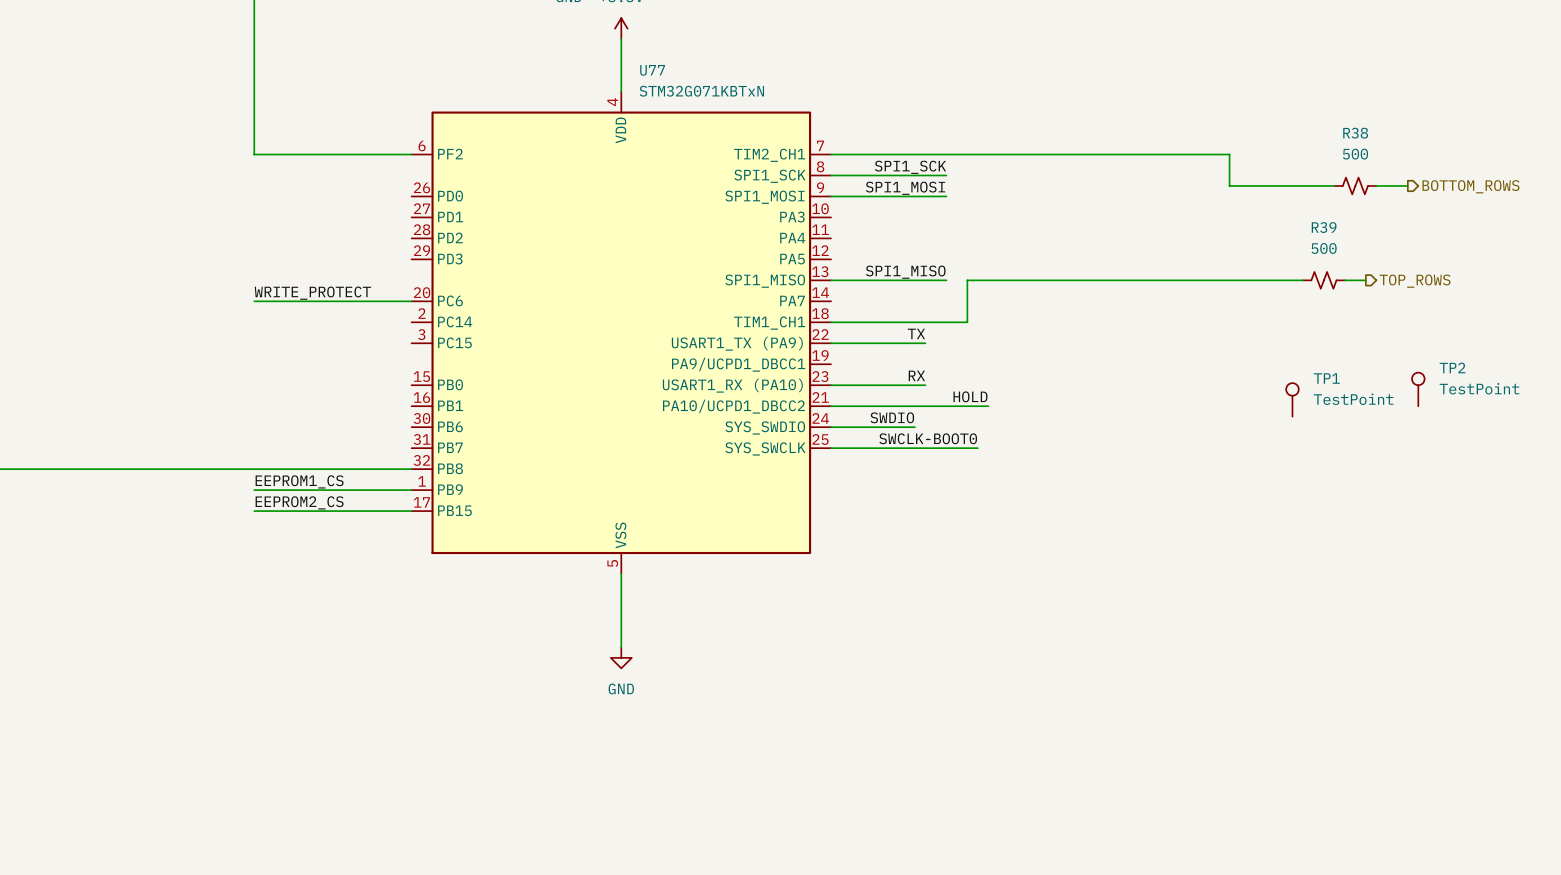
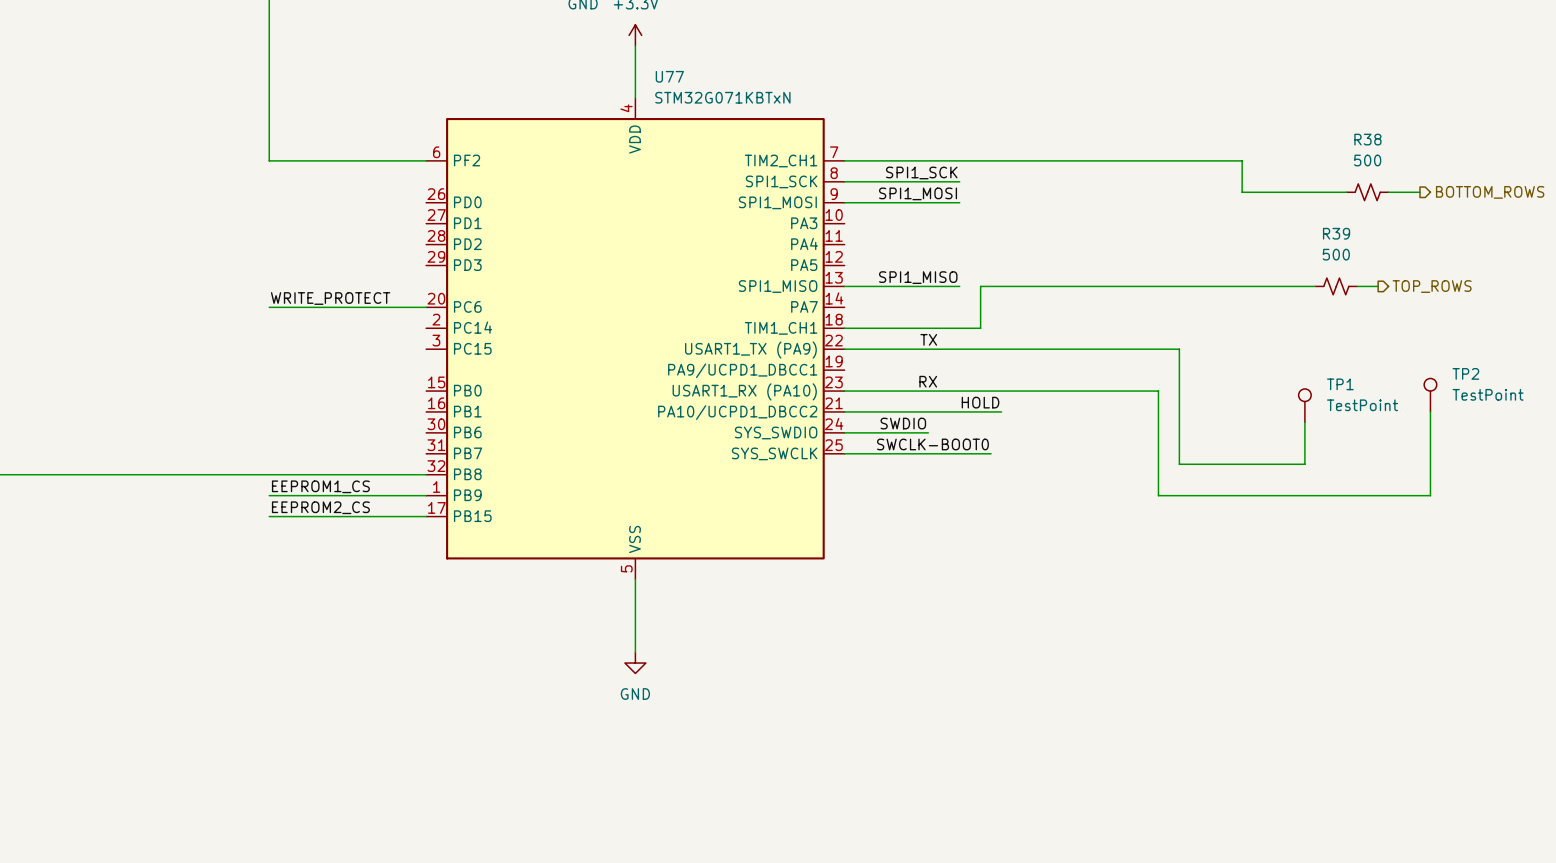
wire: none -> (938, 349) (1179, 349) (1179, 464) (1304, 464) (1304, 422)
wire: none -> (938, 391) (1158, 391) (1158, 495) (1430, 495) (1430, 411)

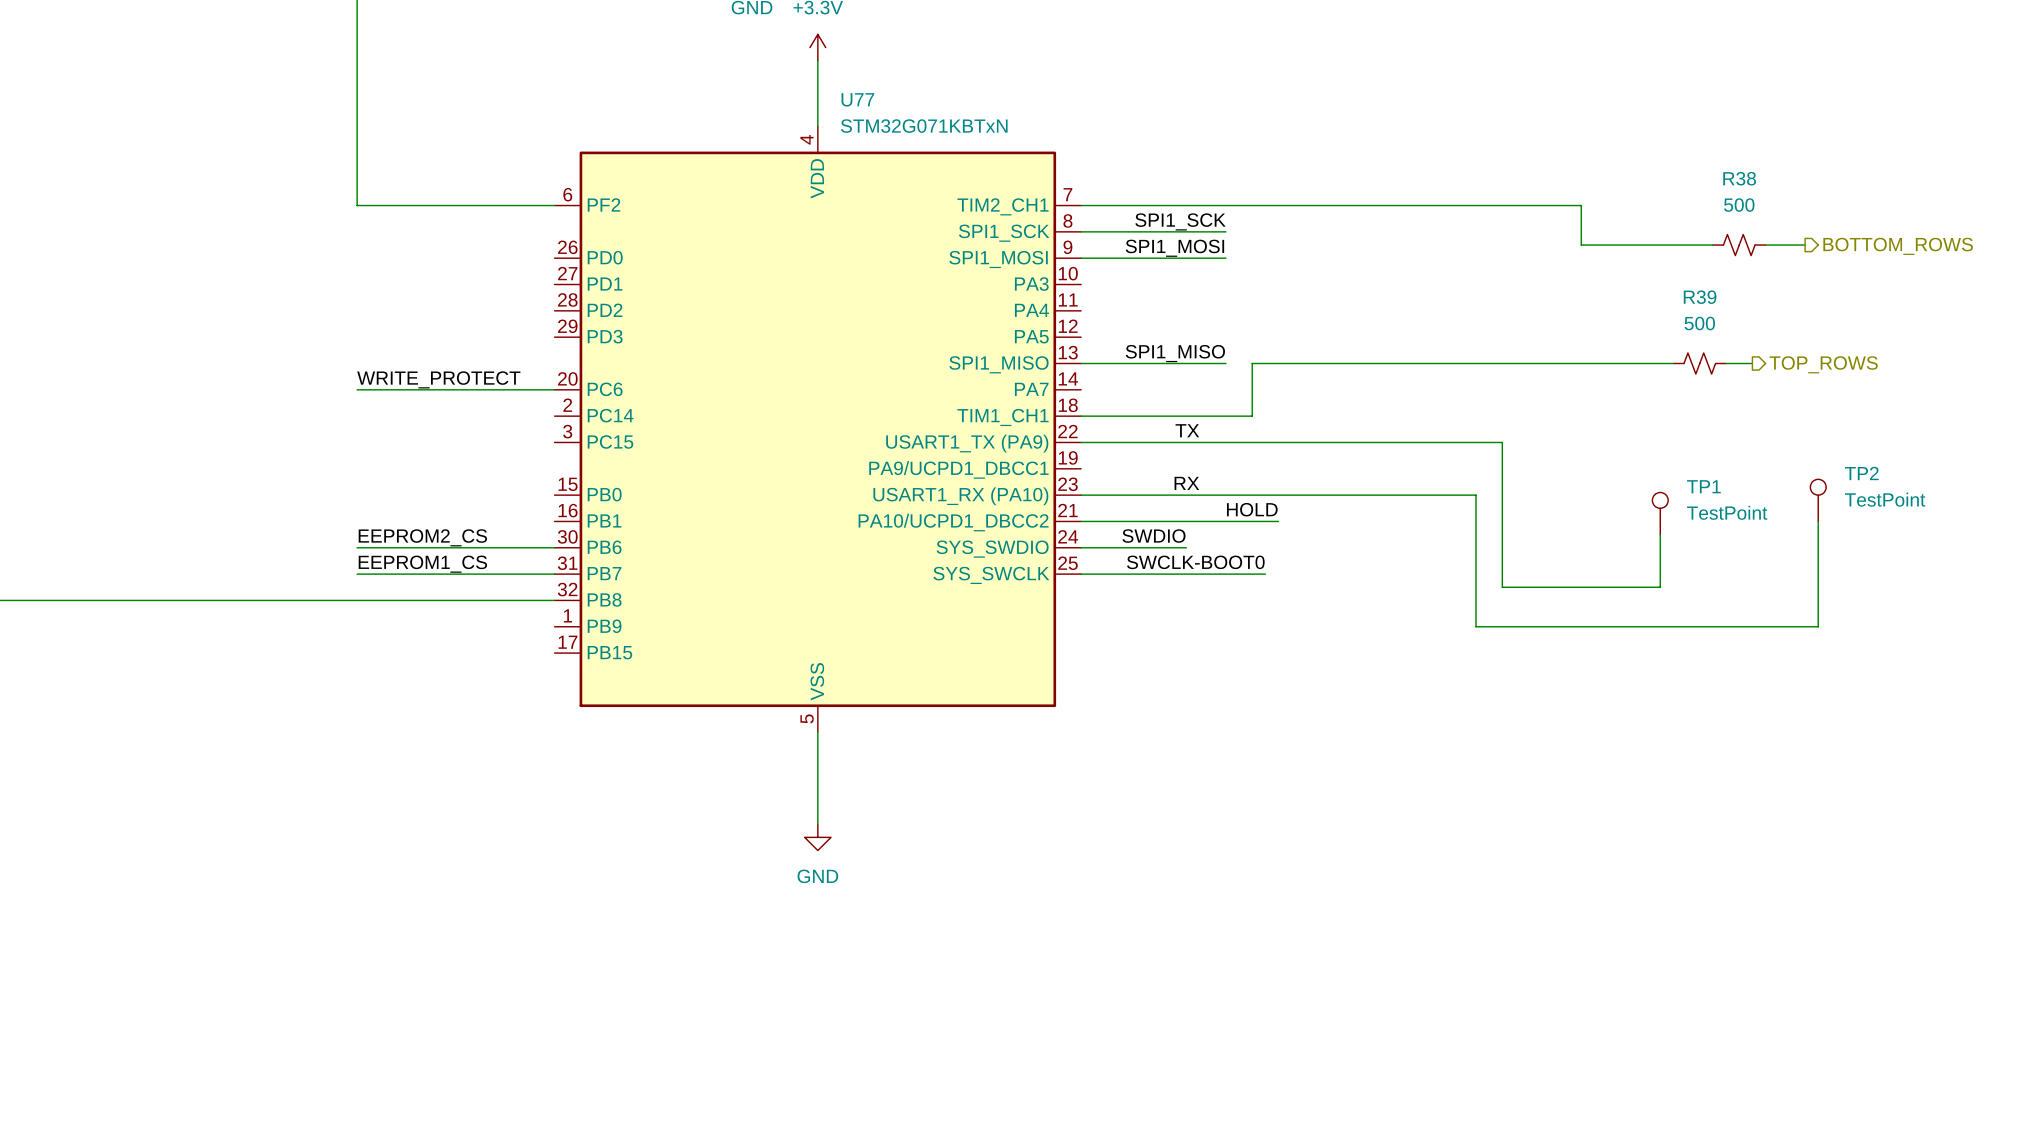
label position: EEPROM1_CS (320, 486) -> EEPROM1_CS (422, 564)
wire: (269, 495) (426, 495) -> (357, 574) (554, 574)
label position: EEPROM2_CS (320, 507) -> EEPROM2_CS (422, 537)
wire: (269, 516) (426, 516) -> (357, 547) (554, 547)

